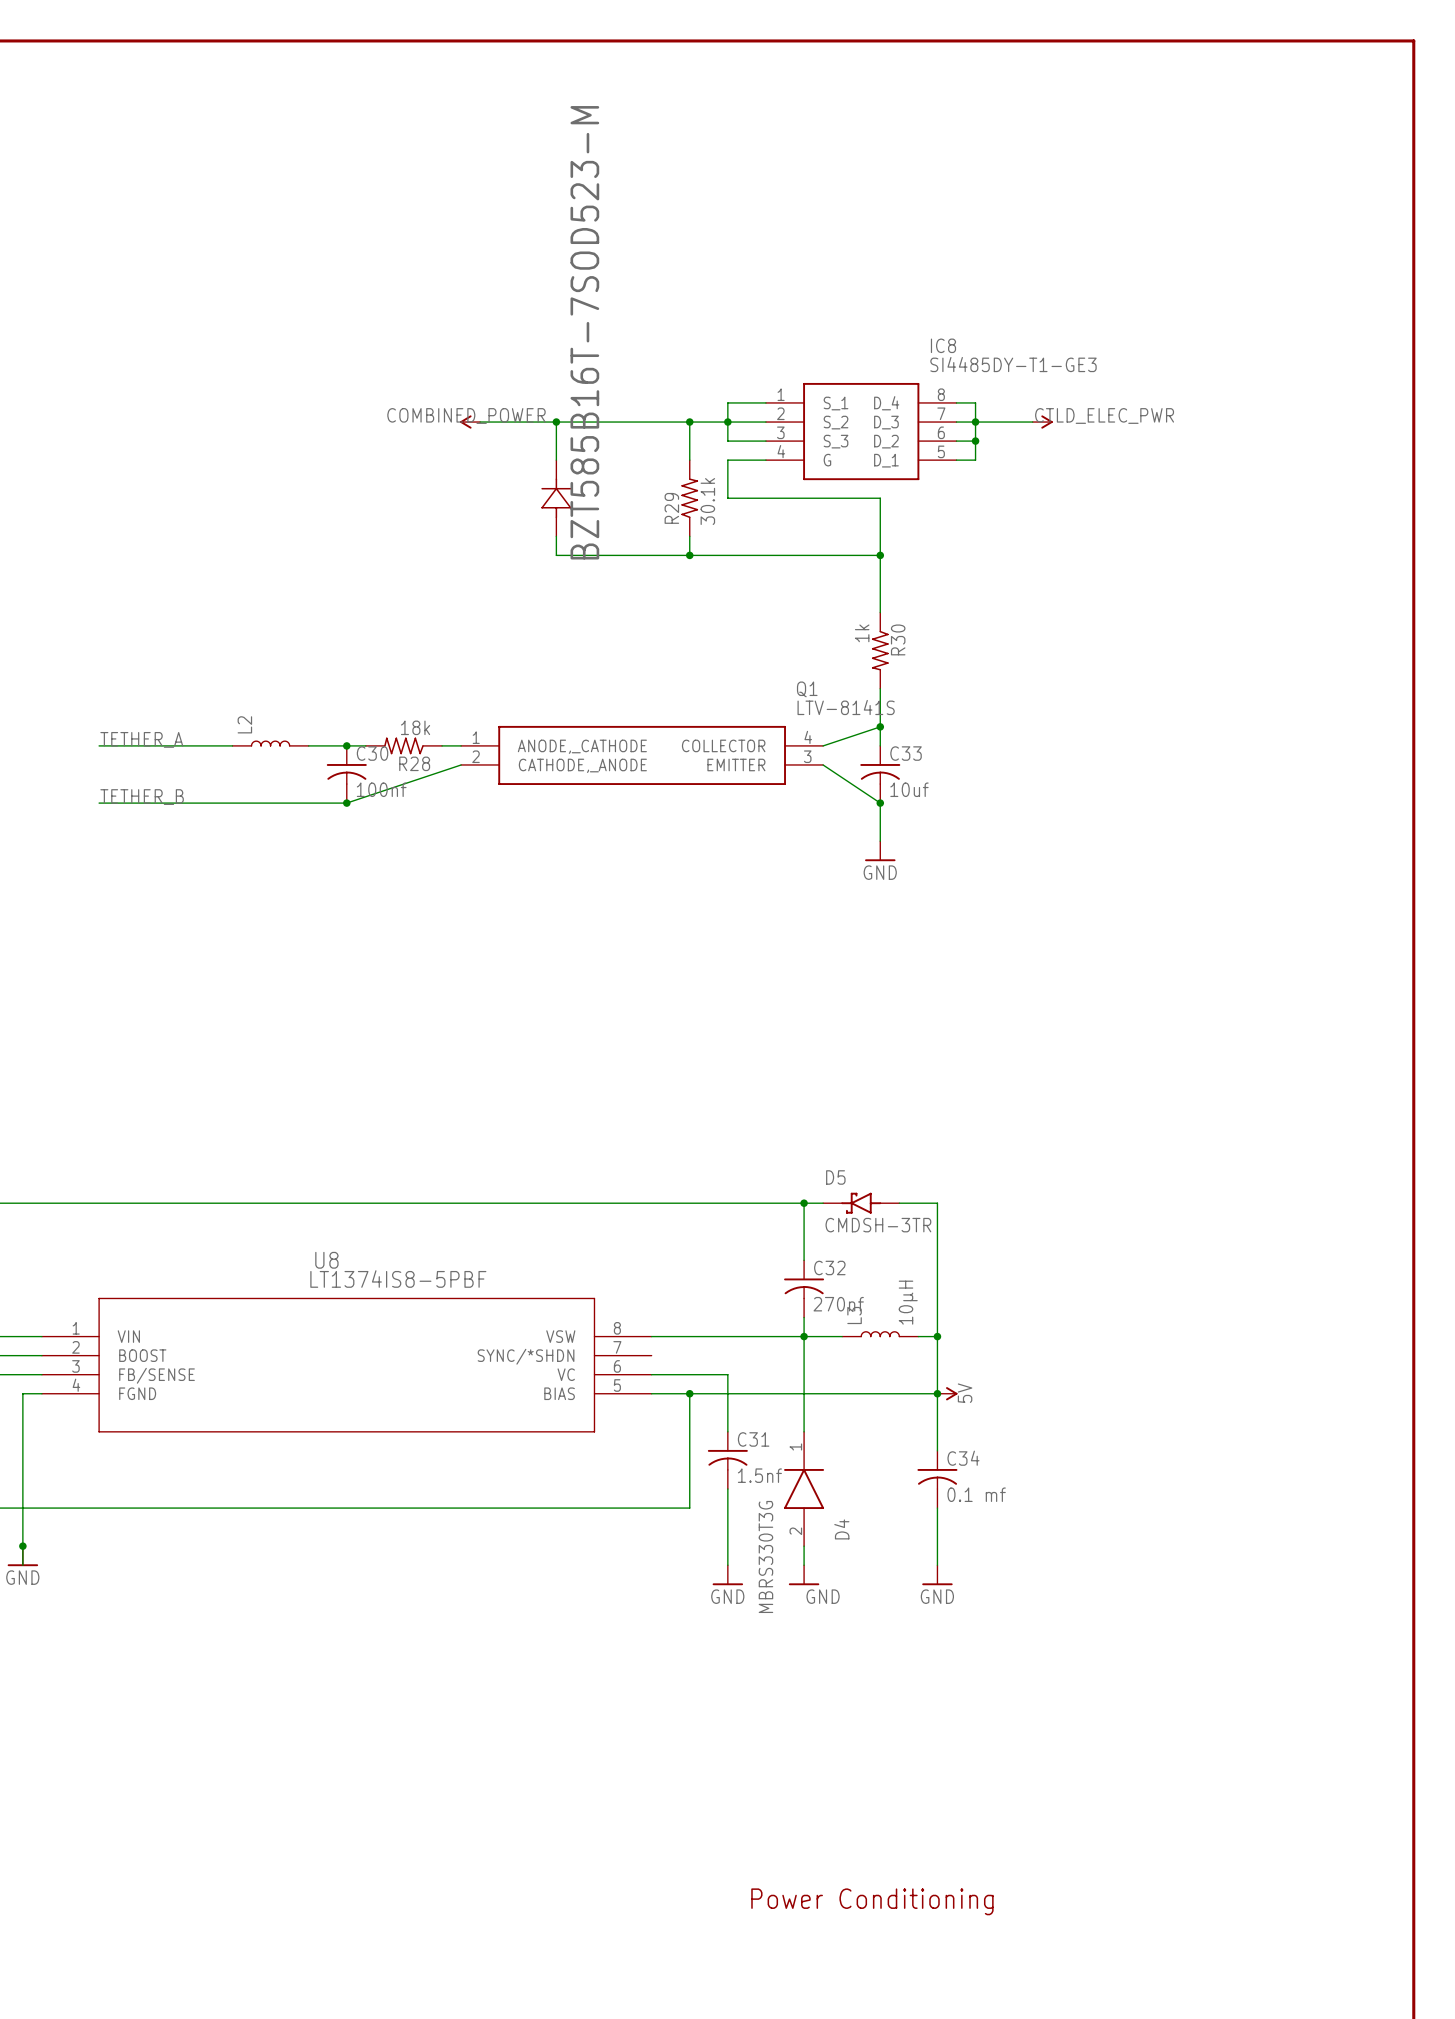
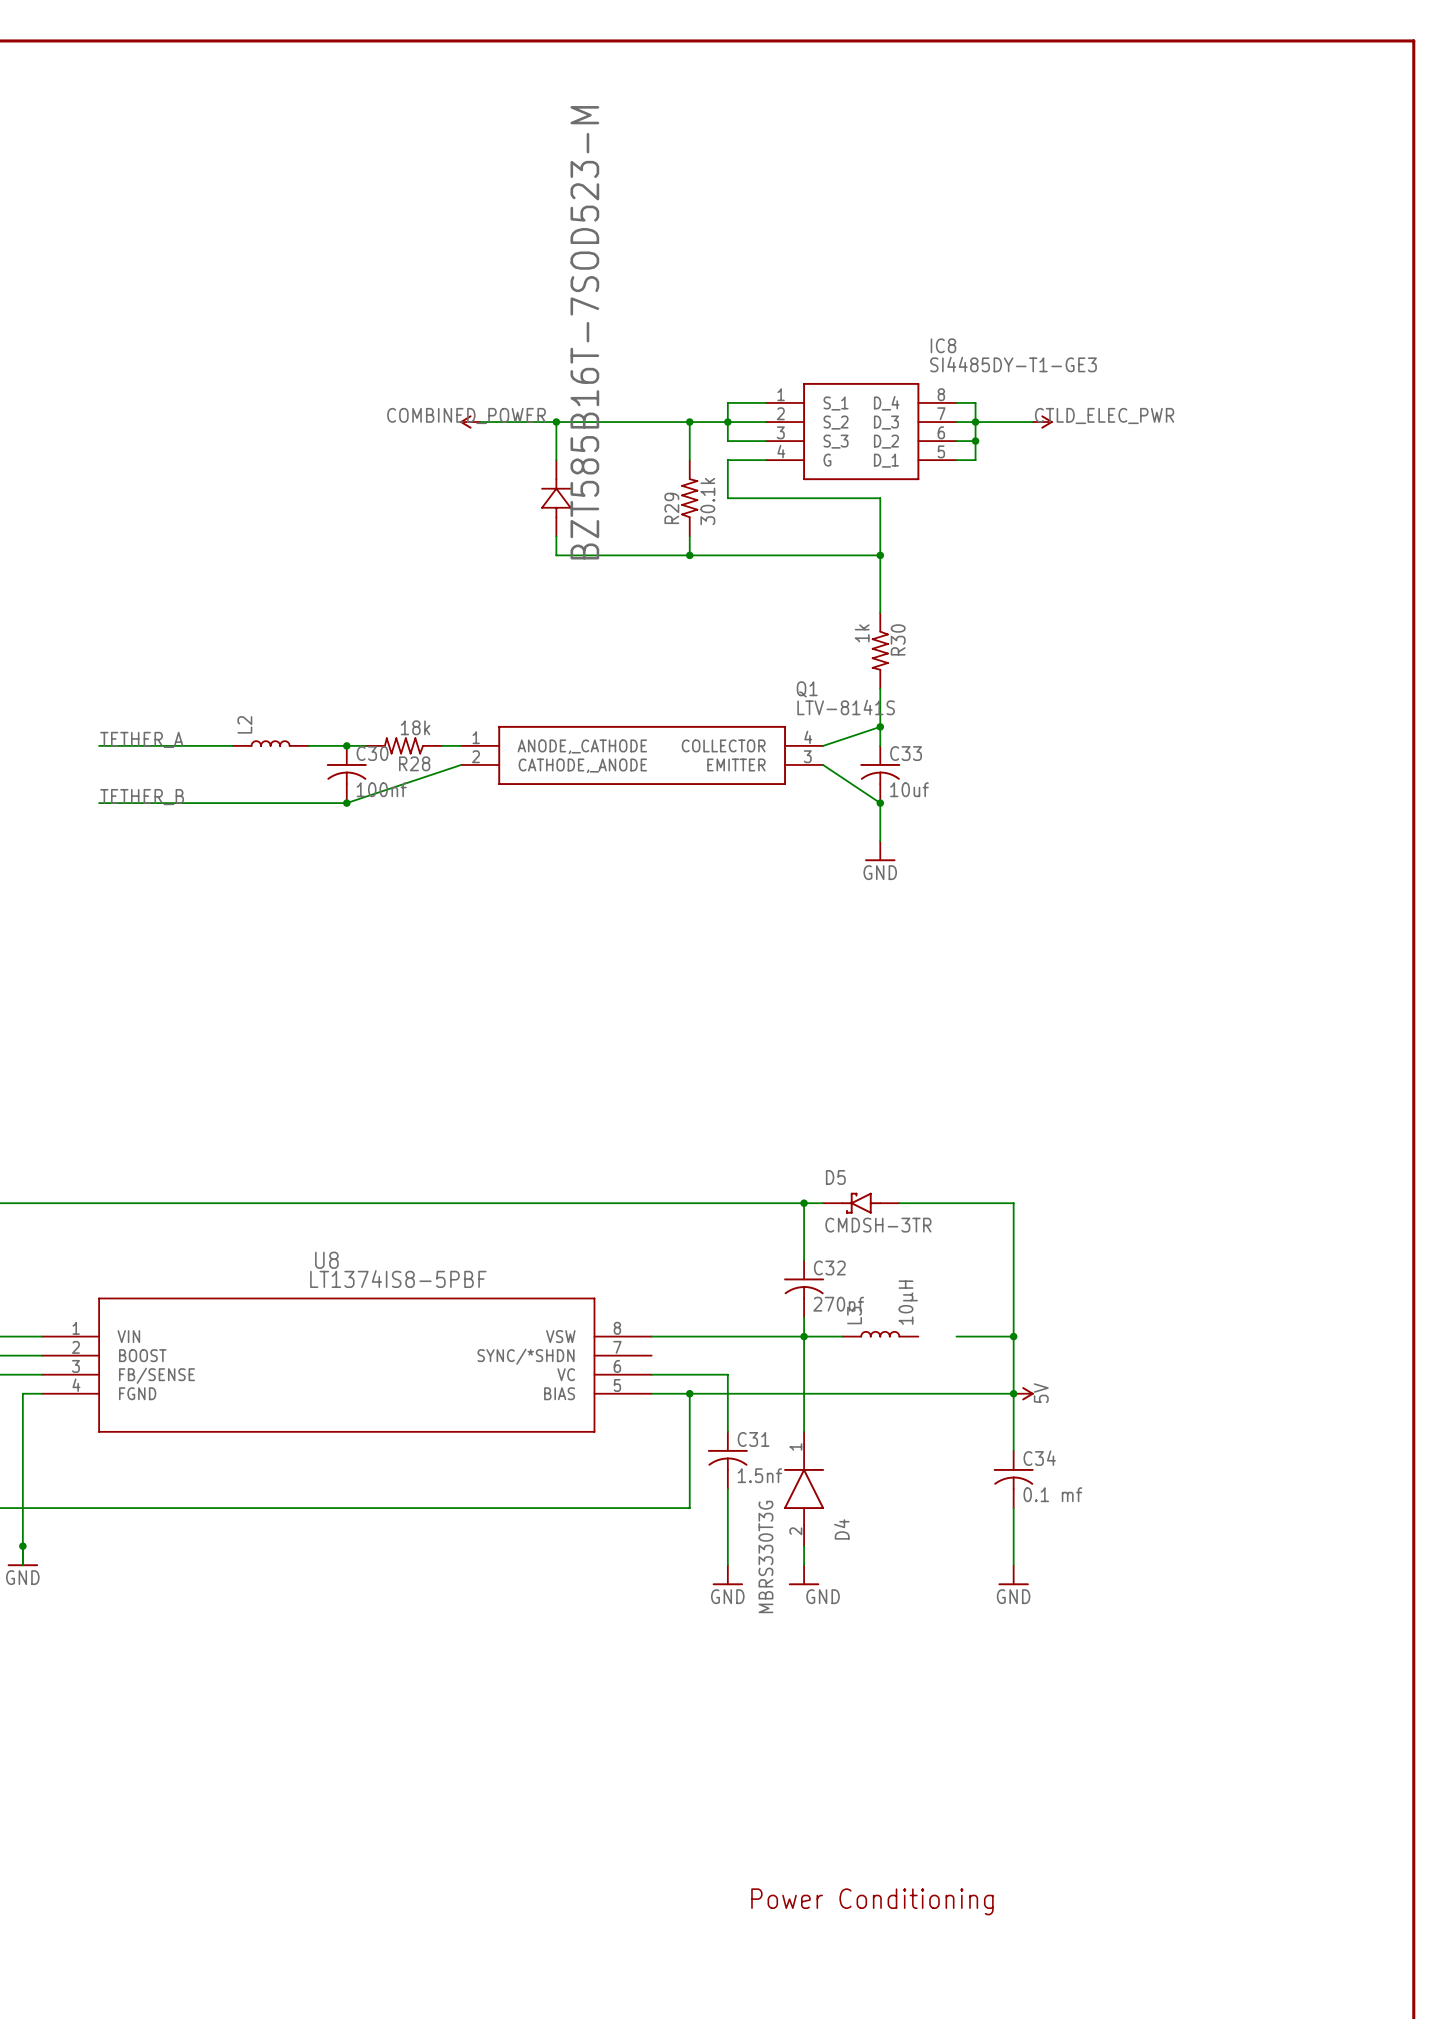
wire: (937, 1203) (937, 1450) -> (937, 1203) (1013, 1203) (1013, 1450)
wire: (918, 1336) (937, 1336) -> none
junction: (937, 1336) -> none
wire: none -> (956, 1336) (1013, 1336)
junction: none -> (1013, 1336)
wire: none -> (937, 1393) (1013, 1393)
junction: (937, 1393) -> none
power symbol position: 5V (947, 1393) -> 5V (1023, 1393)
junction: none -> (1013, 1393)
C34 position: (937, 1479) -> (1013, 1479)
wire: (937, 1508) (937, 1565) -> (1013, 1508) (1013, 1565)
power symbol position: GND (937, 1575) -> GND (1013, 1575)

